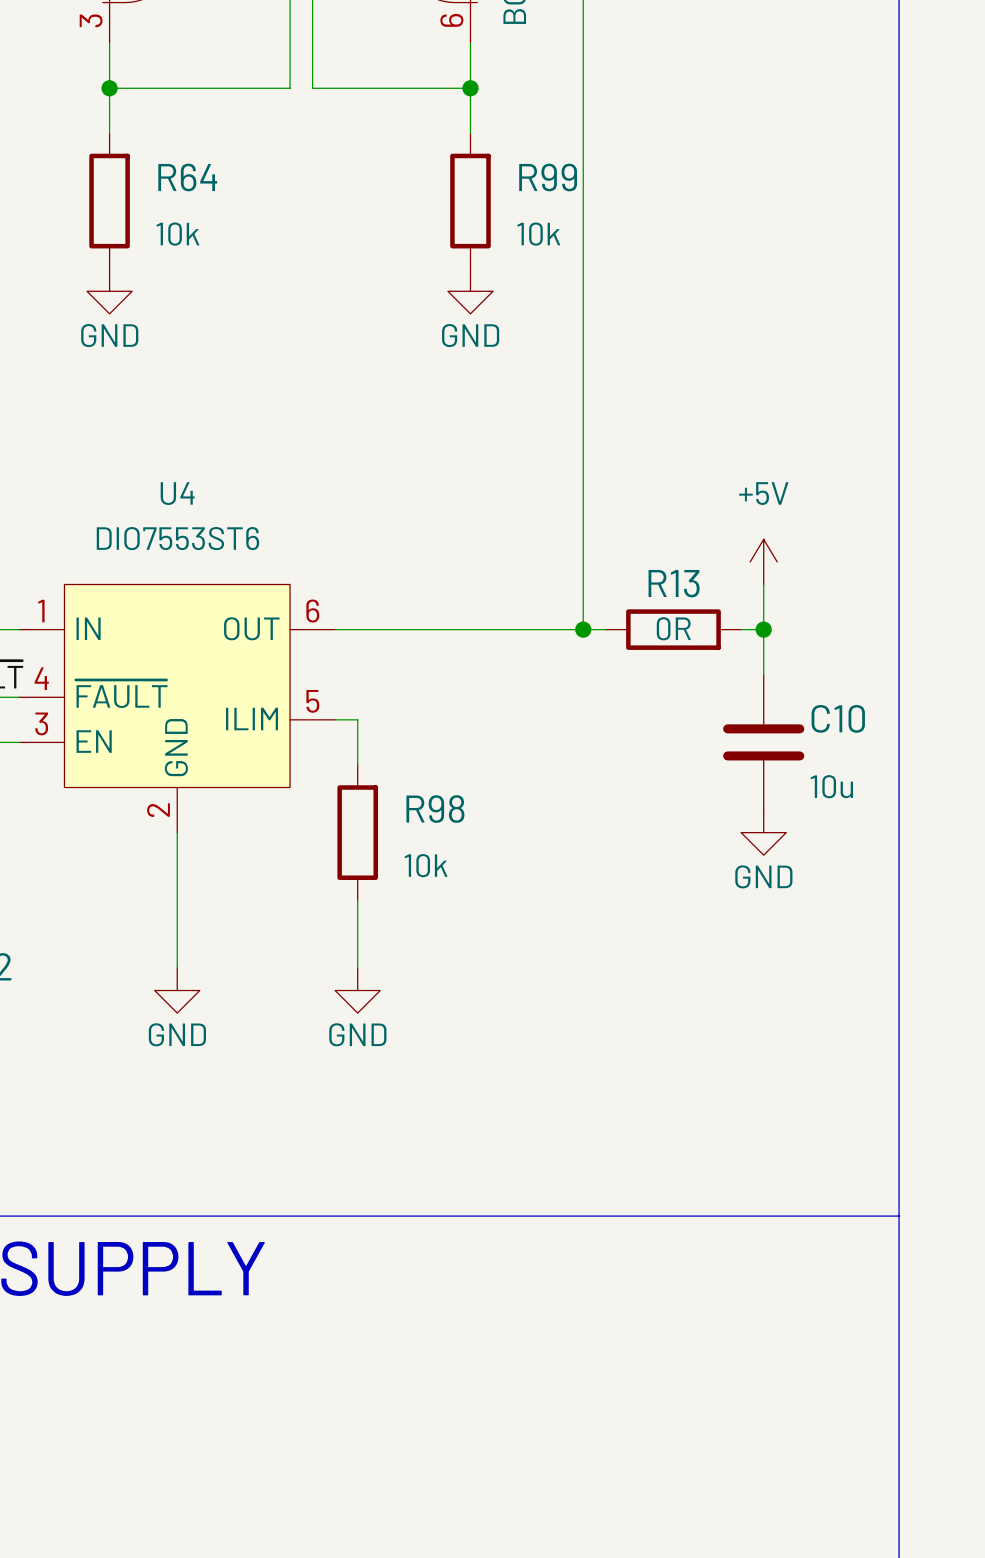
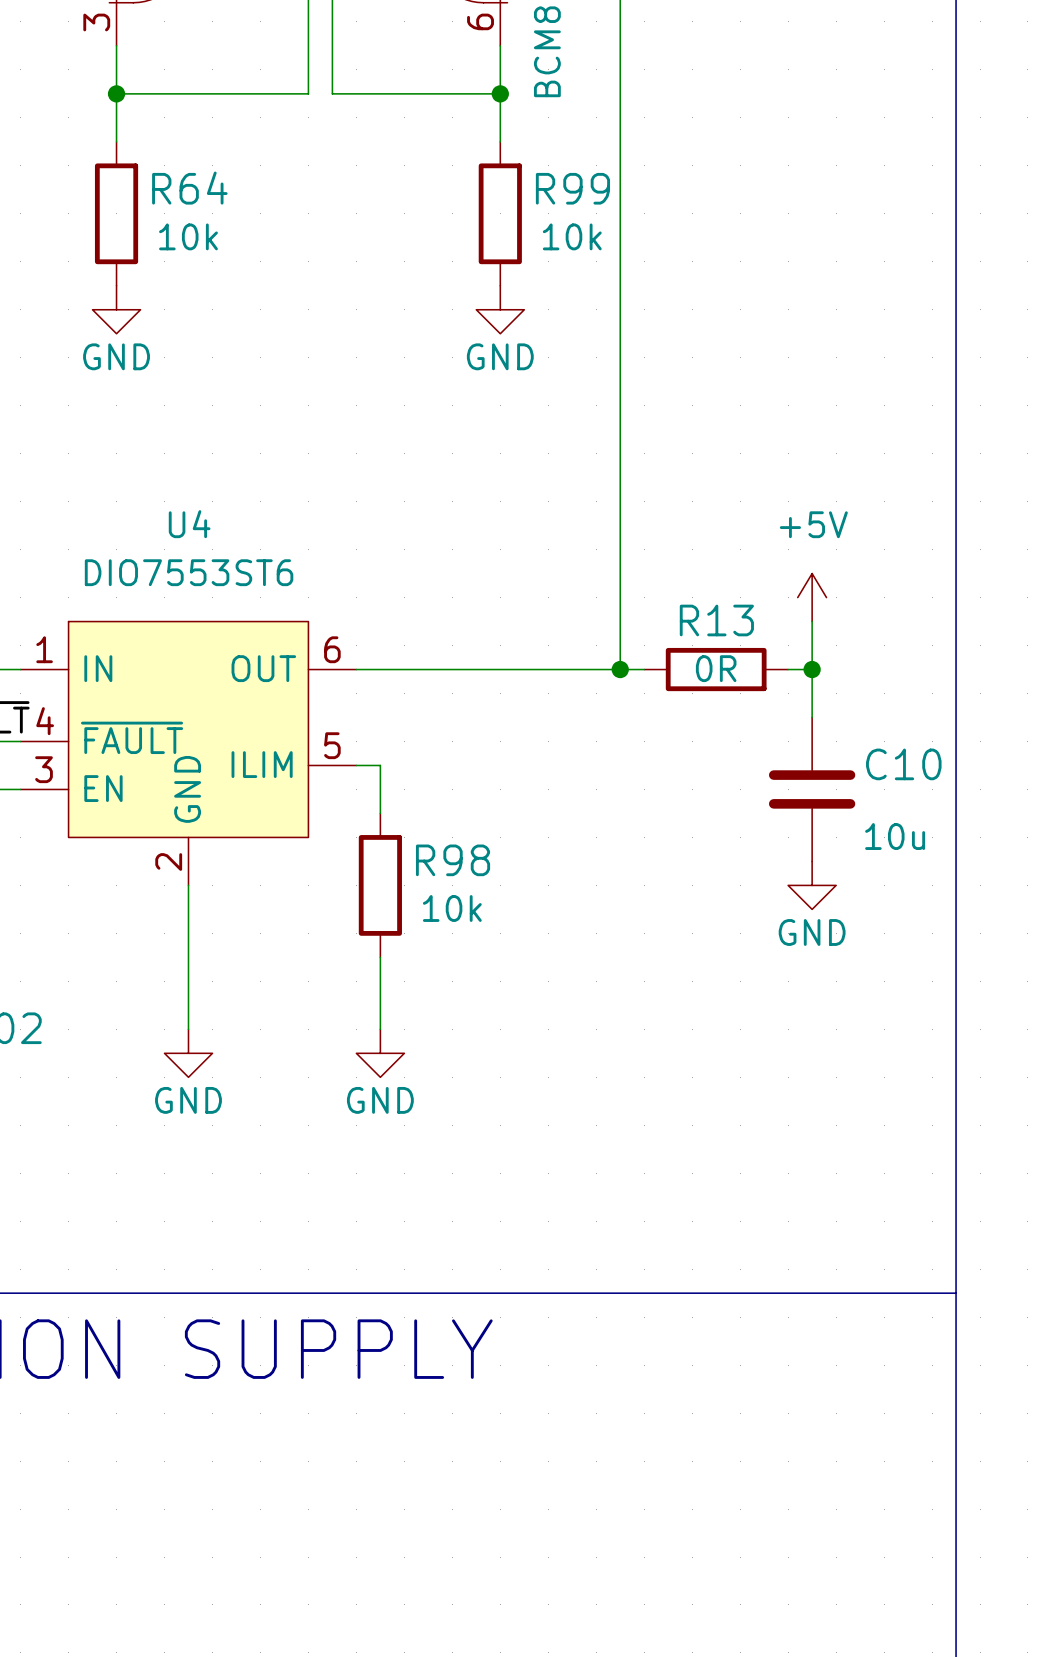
R64 name position: R64 (187, 177) -> R64 (189, 188)
R99 name position: R99 (548, 177) -> R99 (572, 188)
R64 text position: 10k (177, 234) -> 10k (188, 236)
R99 text position: 10k (538, 234) -> 10k (572, 236)
R98 name position: R98 (435, 809) -> R98 (453, 860)
R98 text position: 10k (426, 865) -> 10k (452, 908)

